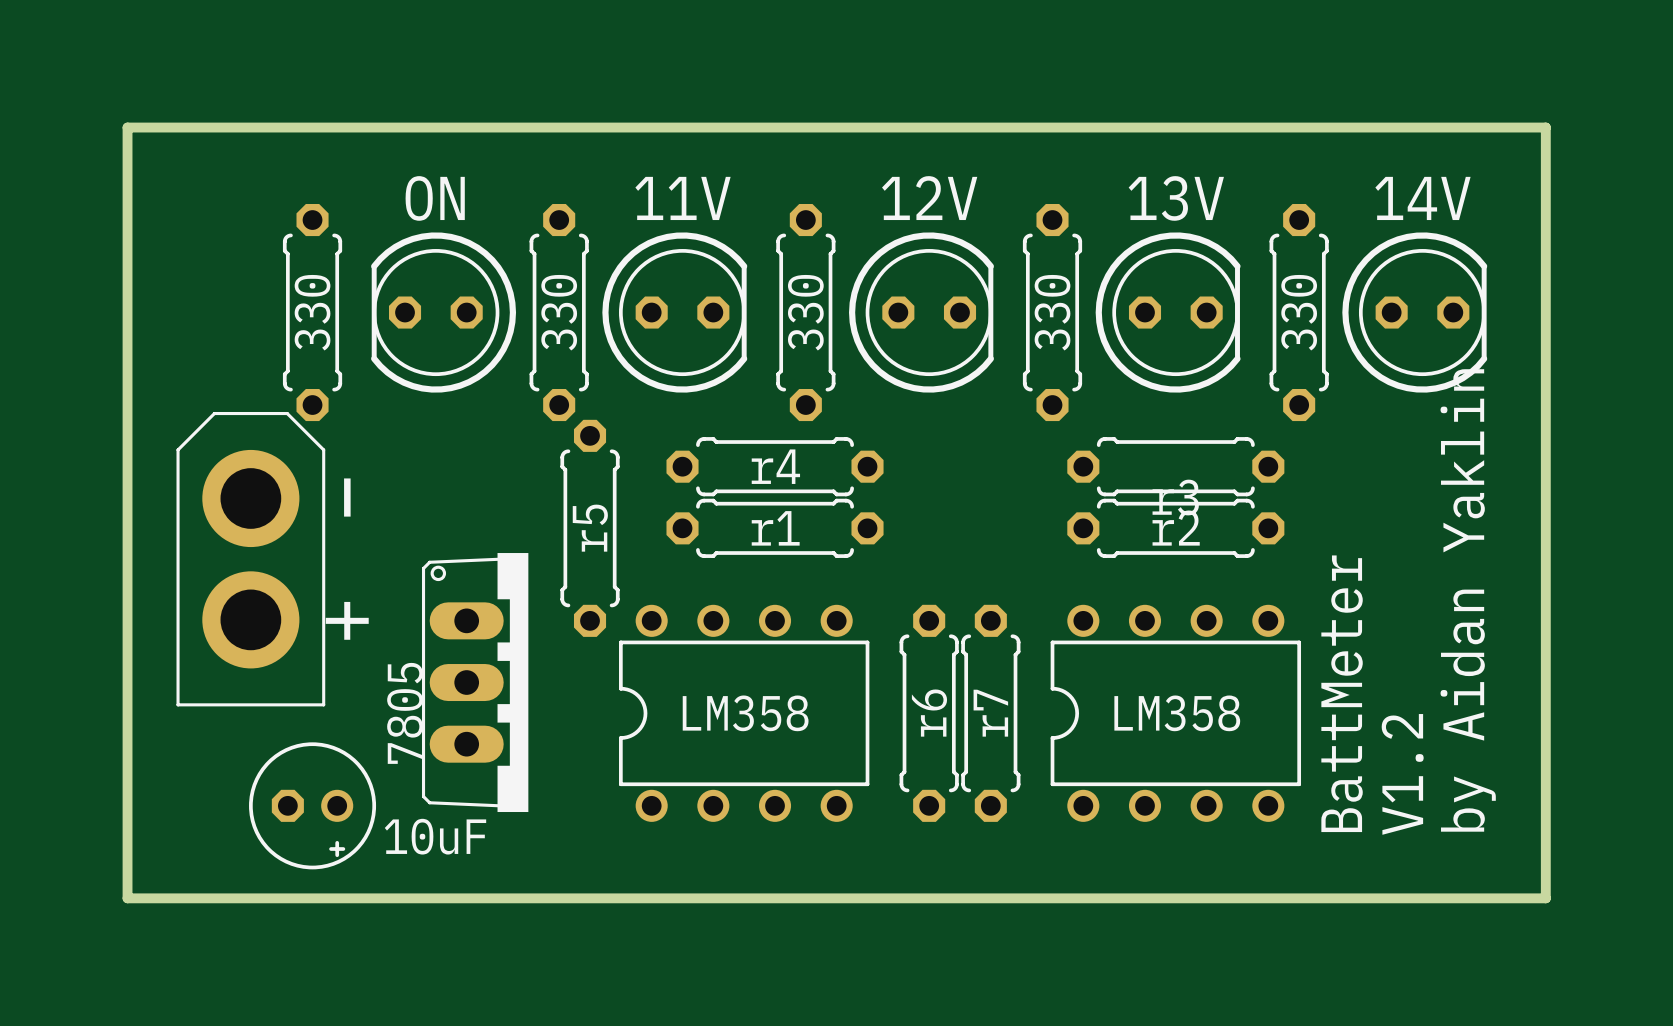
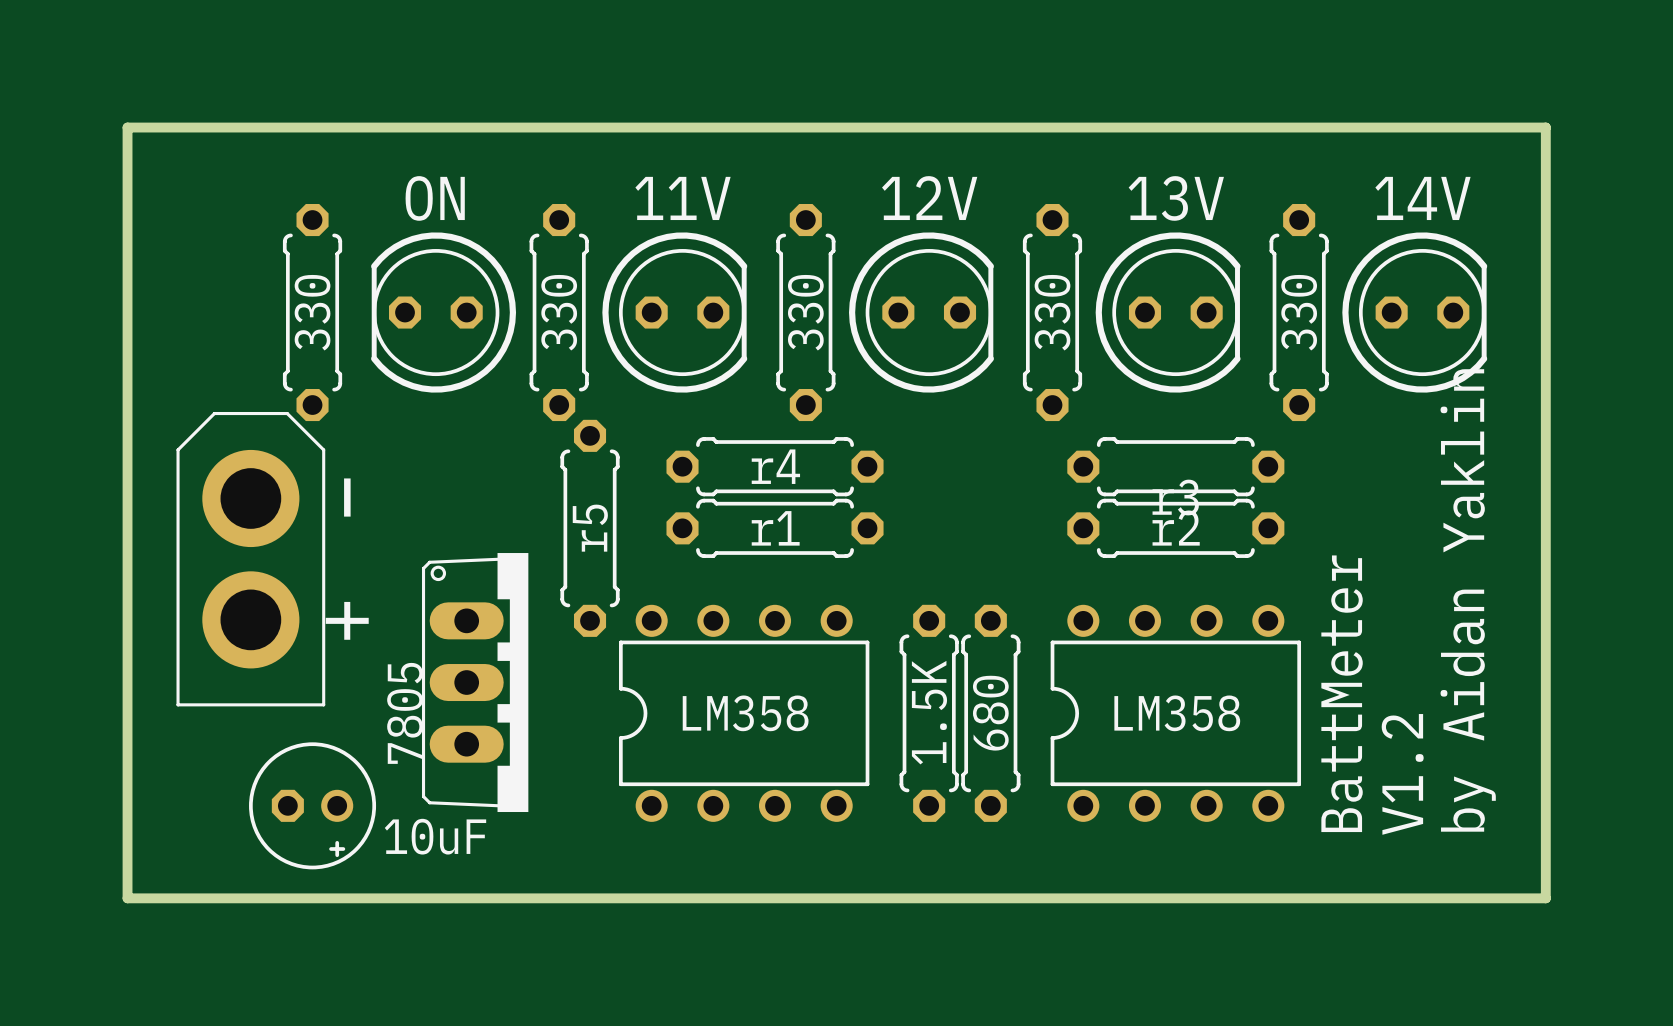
text: r6 (929, 713) -> 1.5K (929, 712)
text: r7 (990, 713) -> 680 (990, 713)

